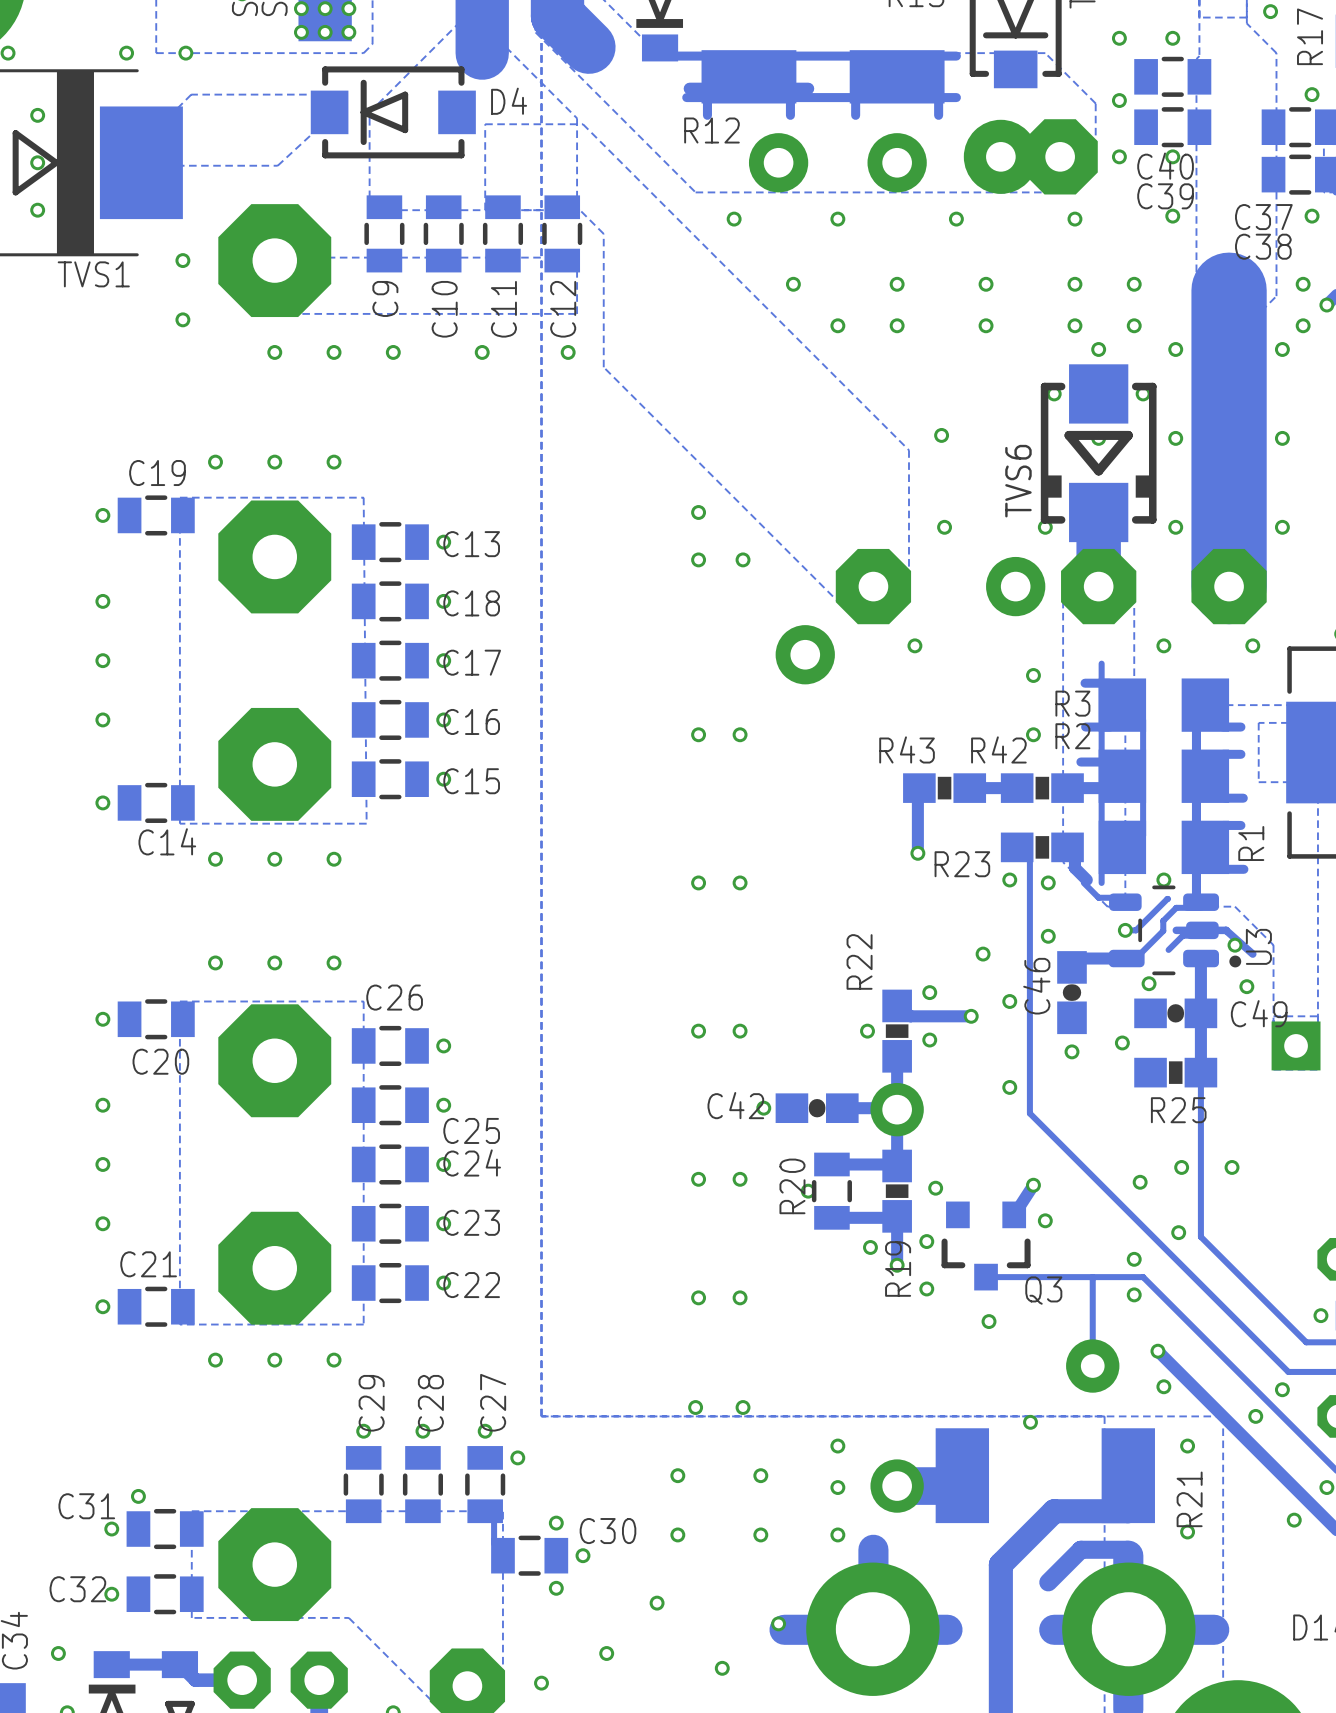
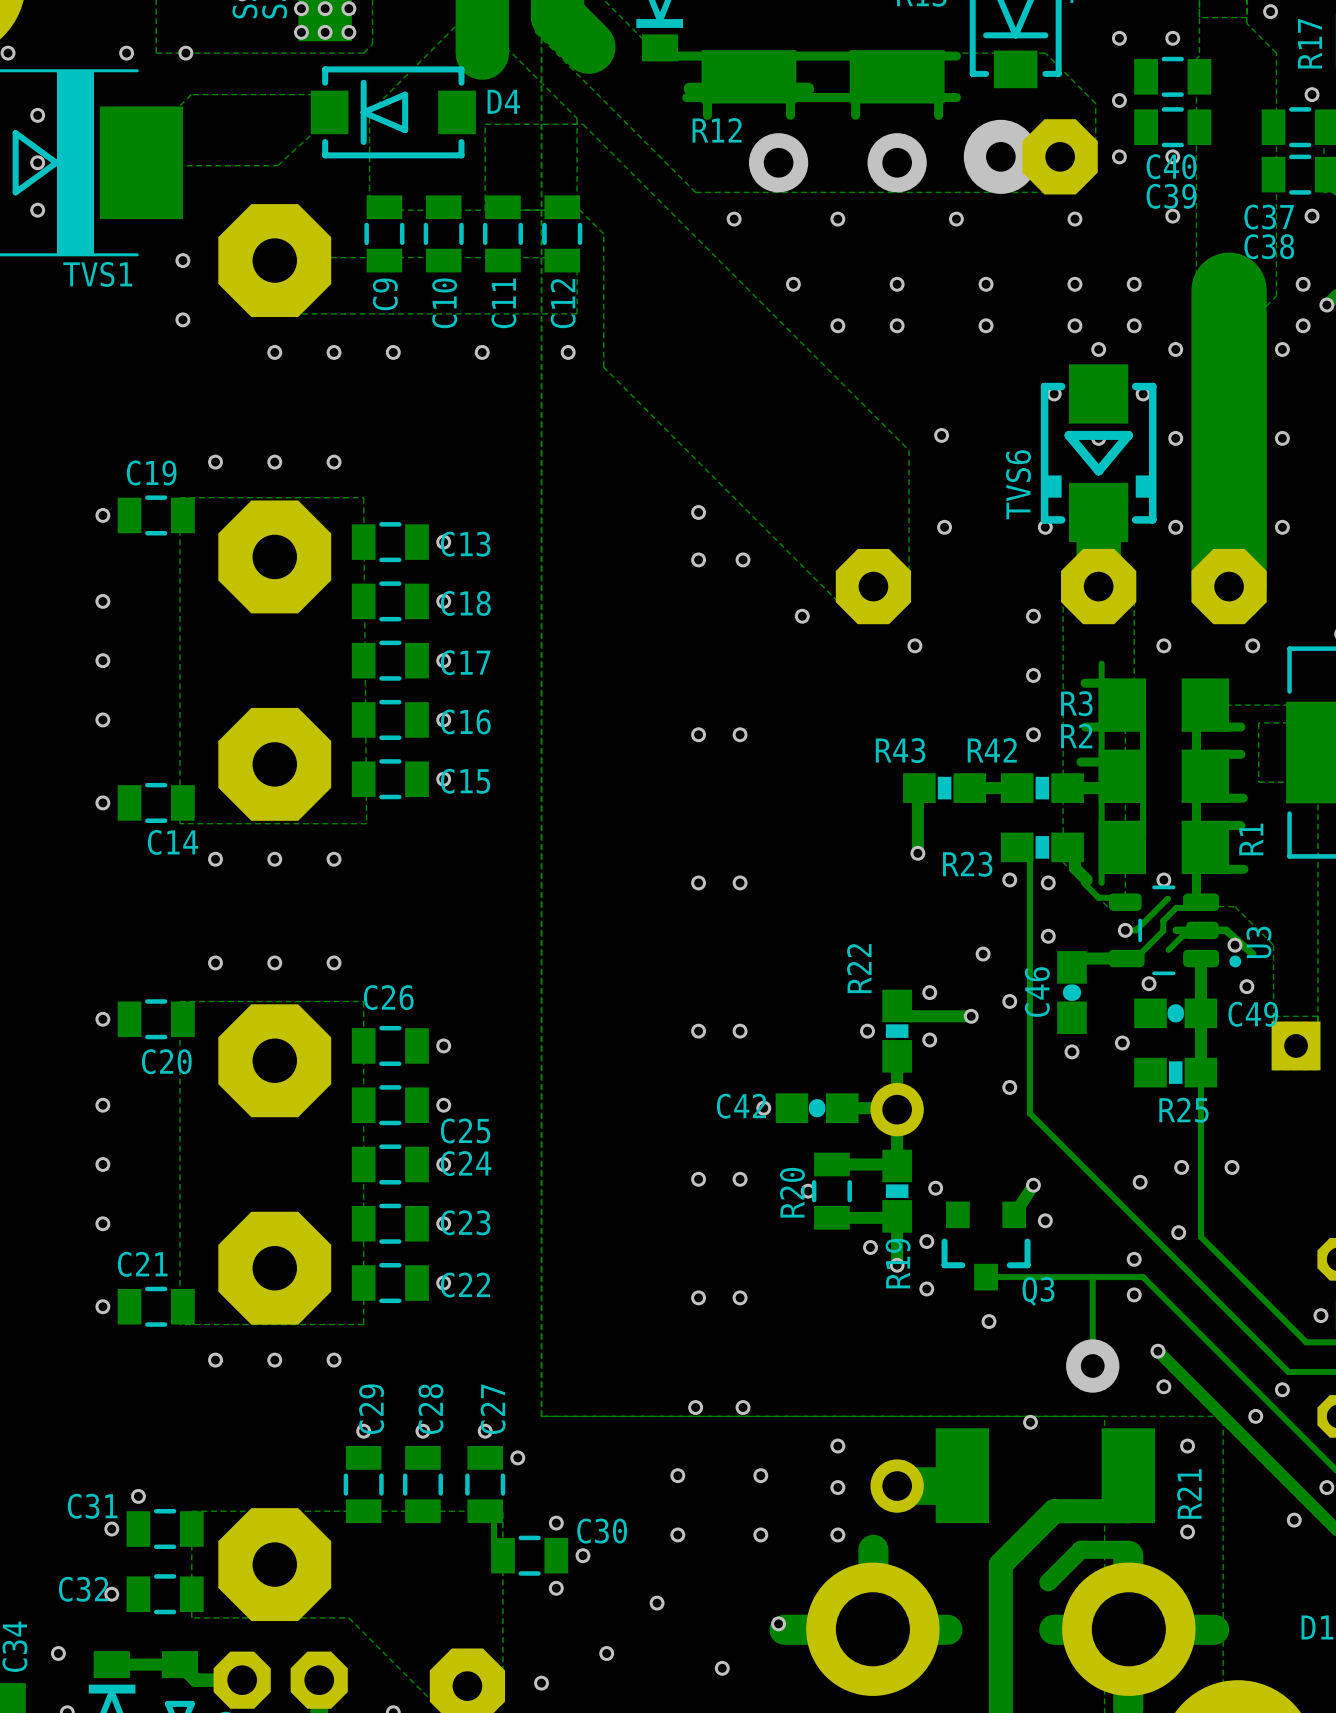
via: (1015, 586) -> none
via: none -> (802, 616)
via: none -> (1033, 616)
via: (805, 654) -> none

